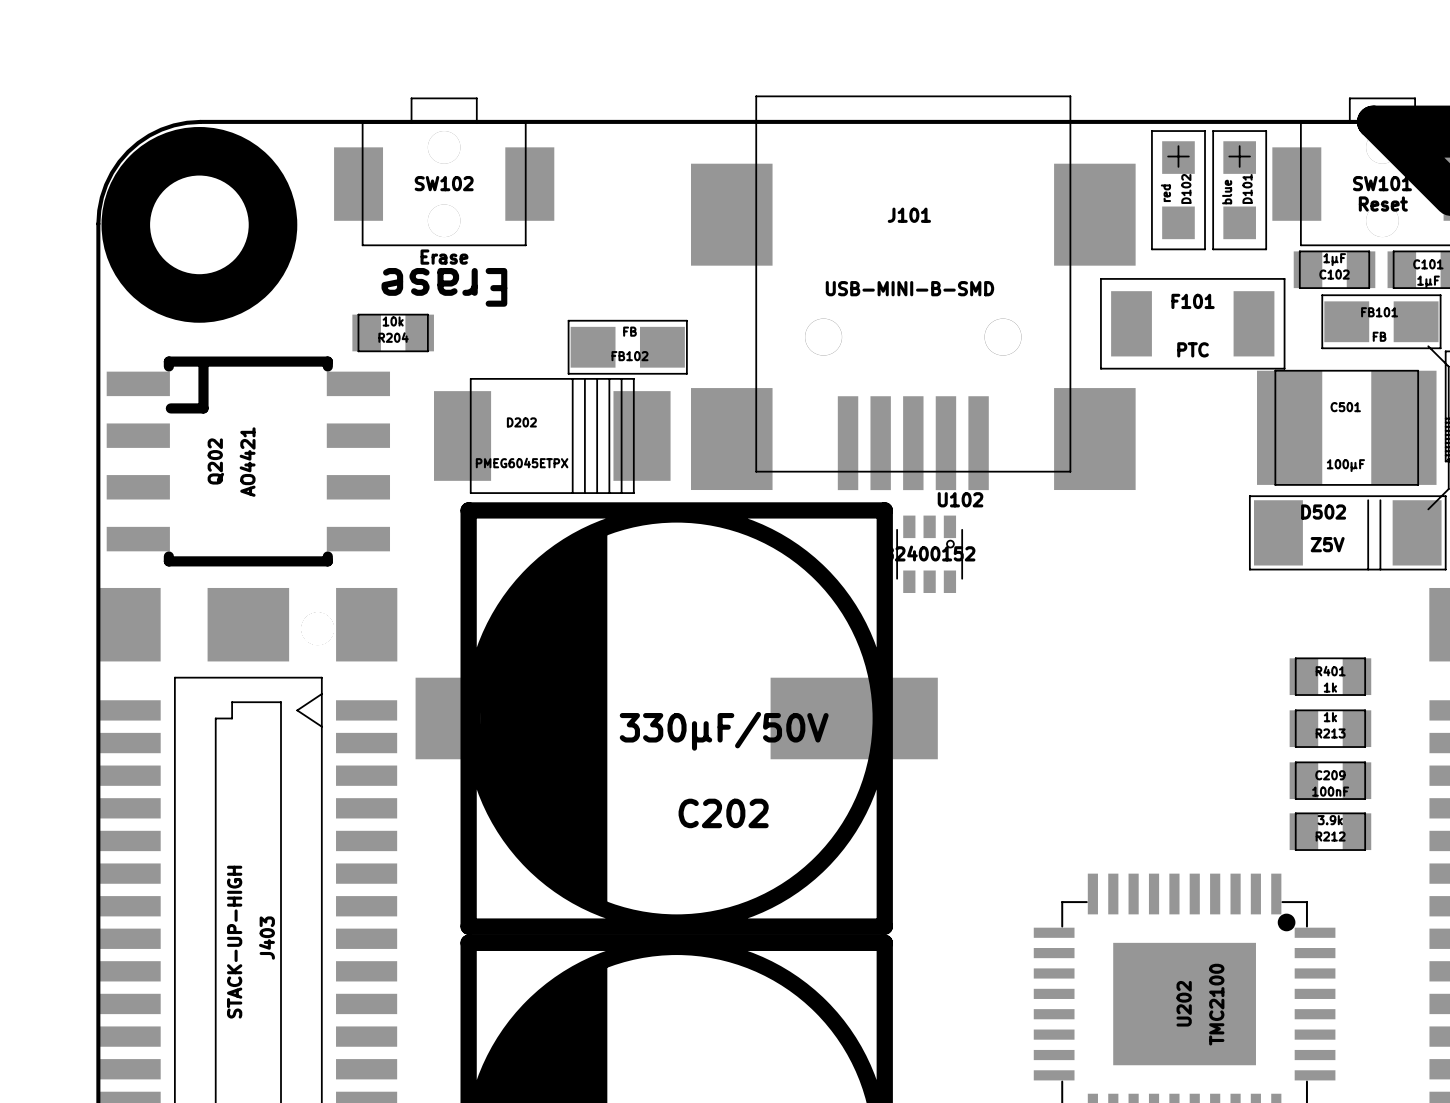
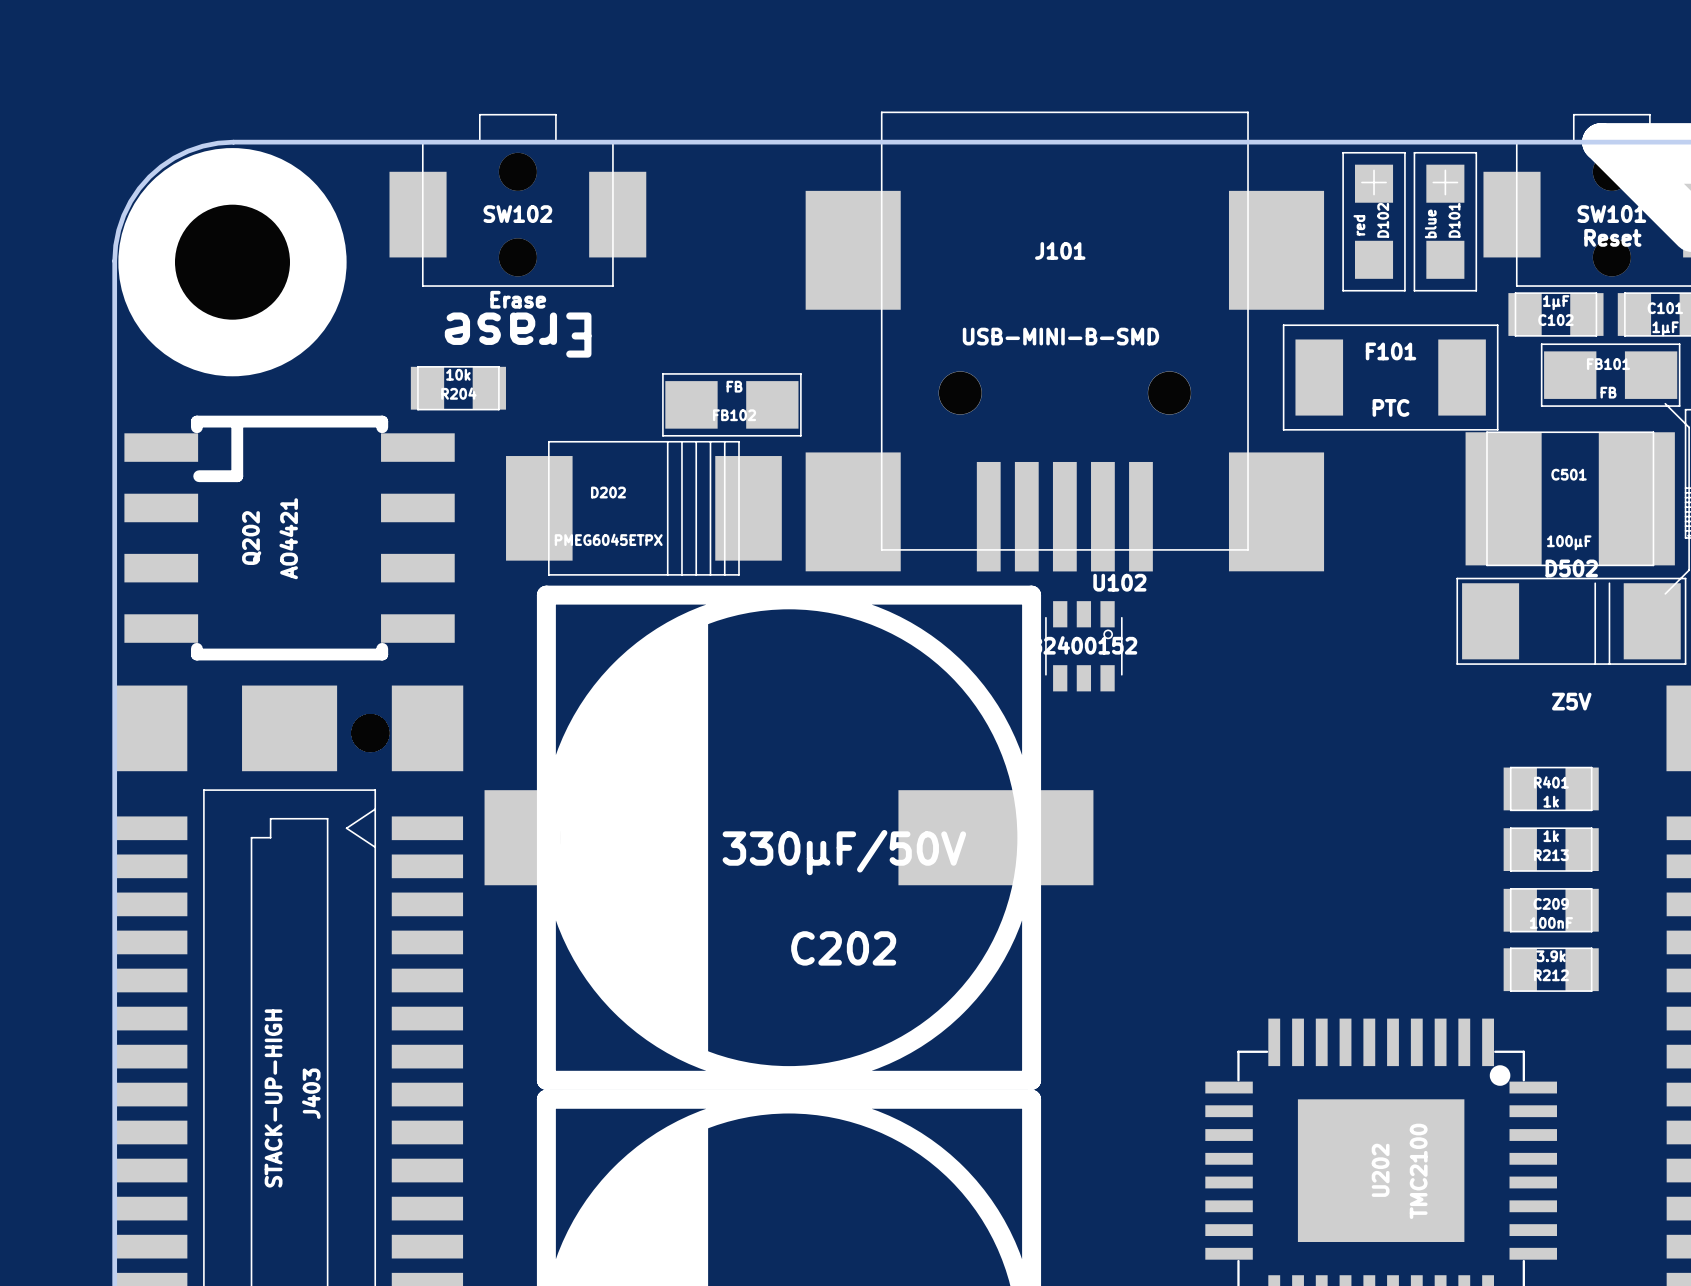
D502 name position: D502 (1323, 512) -> D502 (1571, 568)
D502 value position: Z5V (1327, 544) -> Z5V (1571, 701)

